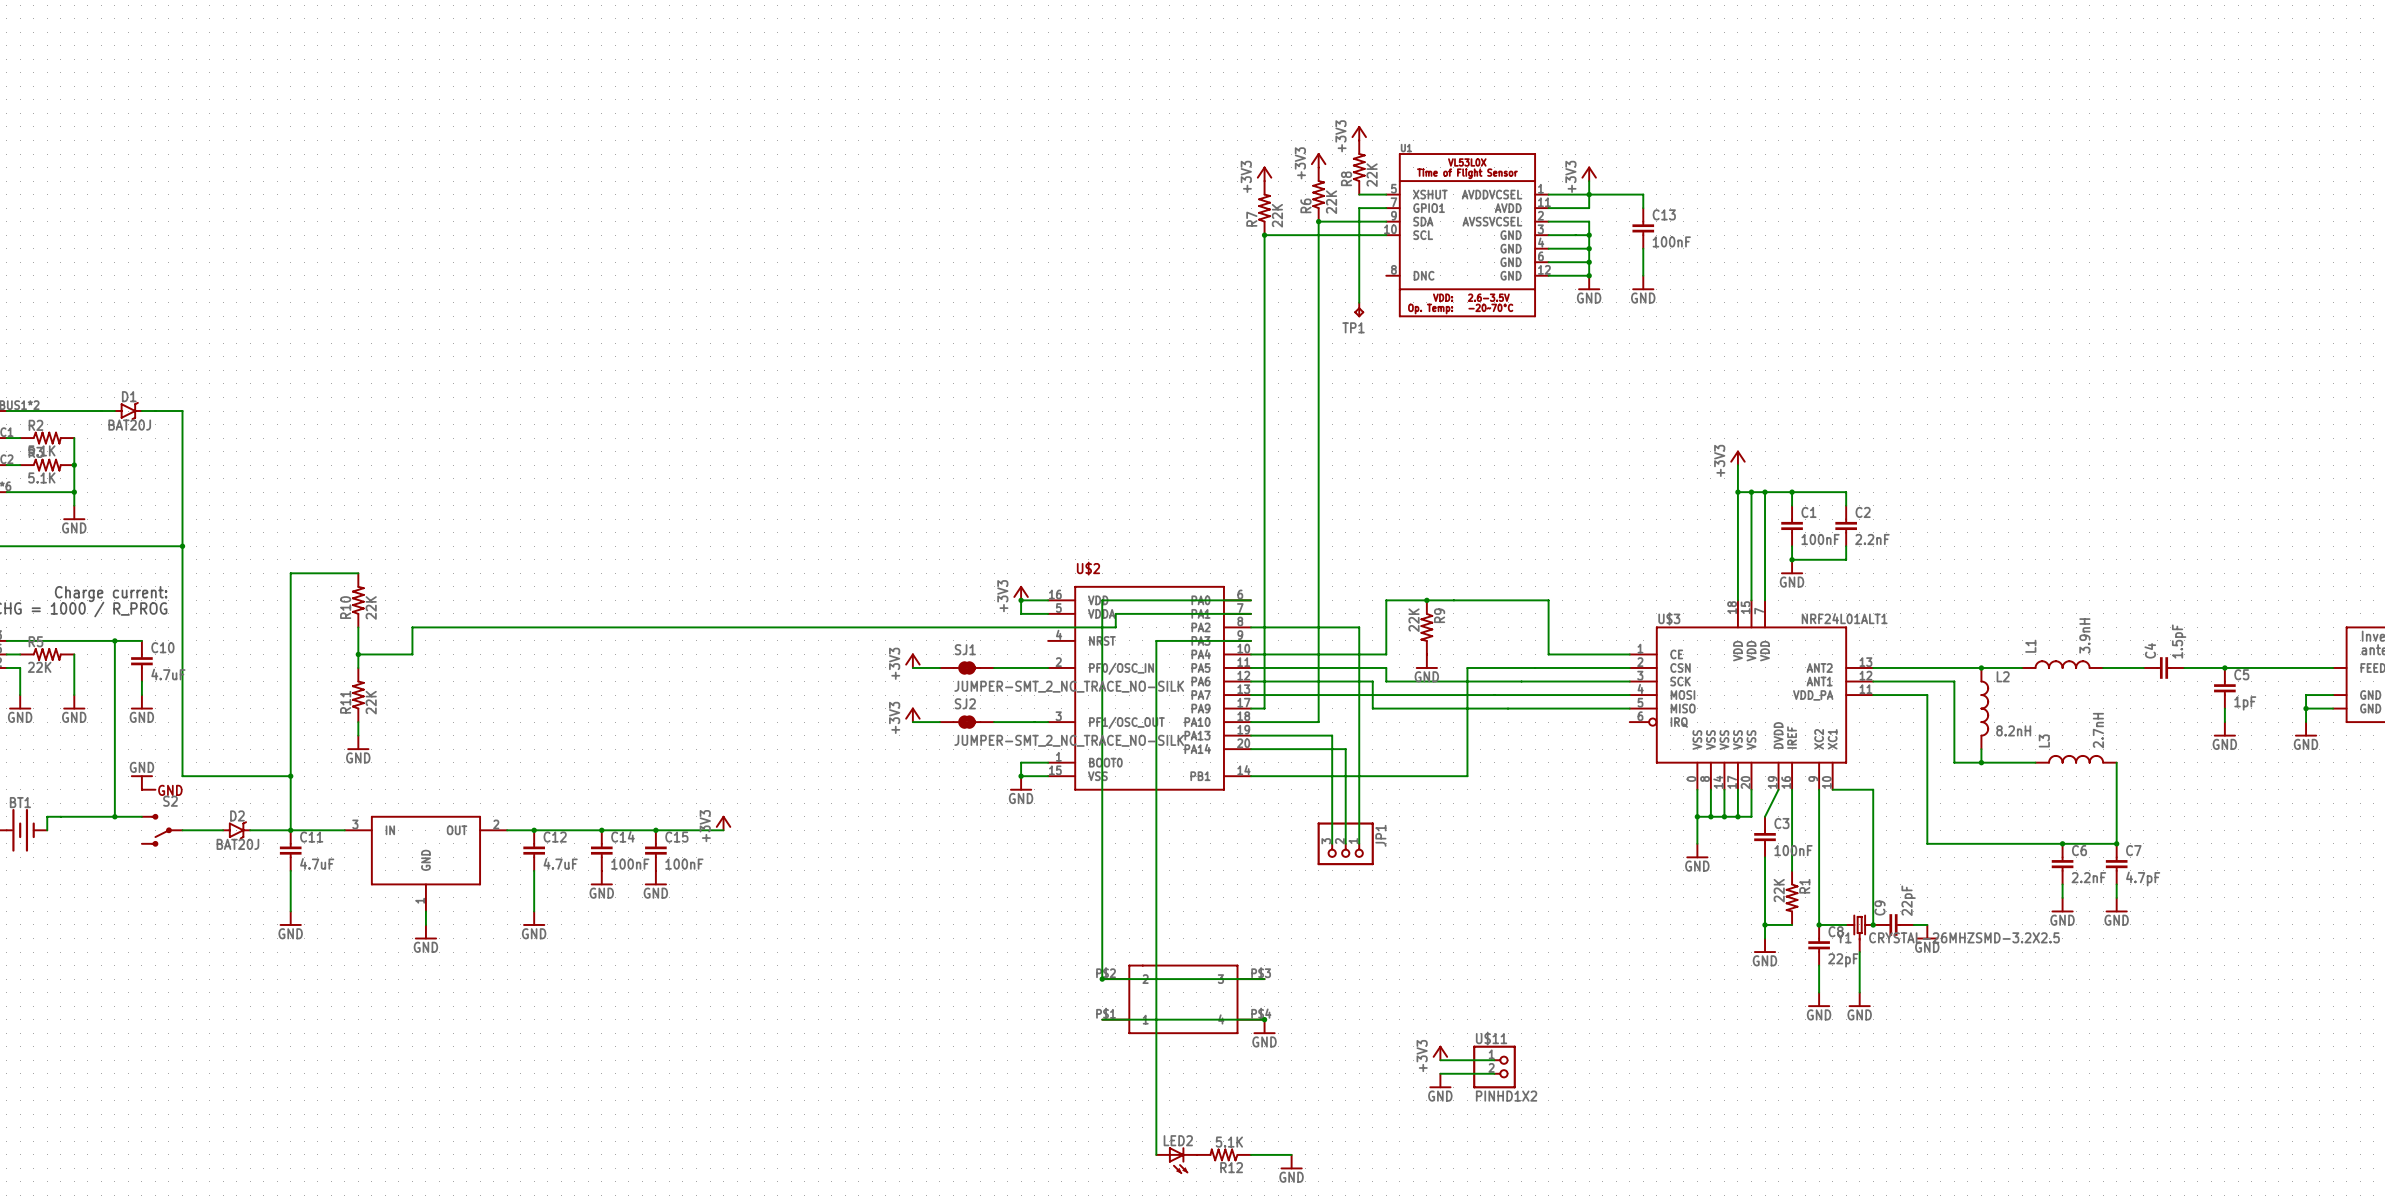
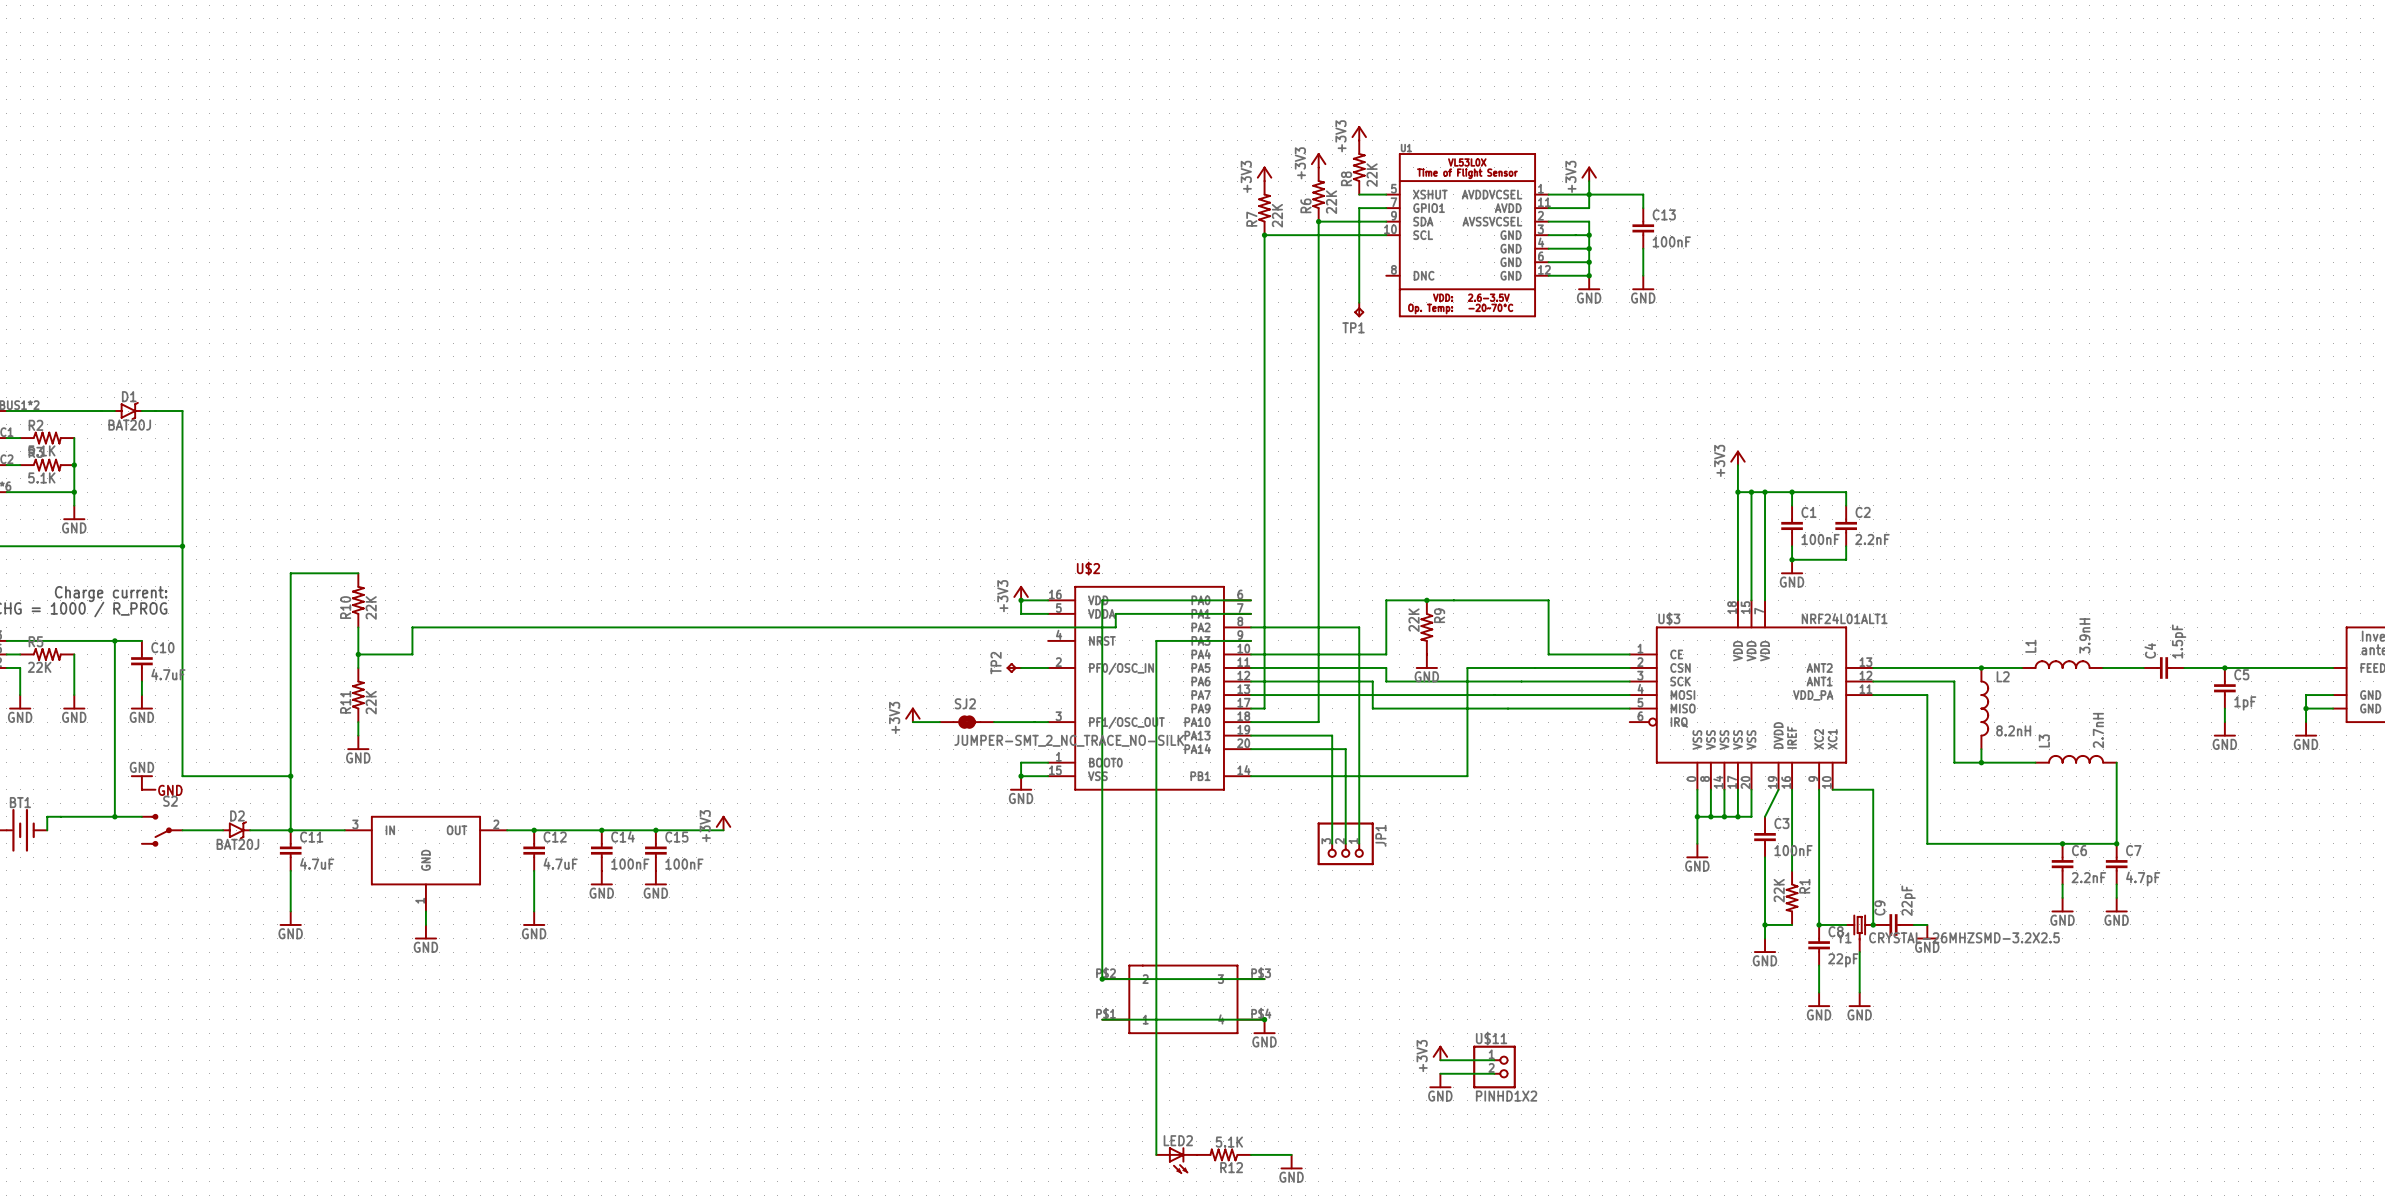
power symbol: +3V3 (912, 660) -> none
wire: (912, 667) (939, 667) -> none
SJ1: JUMPER-SMT_2_NC_TRACE_NO-SILK (966, 667) -> none
TP2: none -> (1013, 667)

